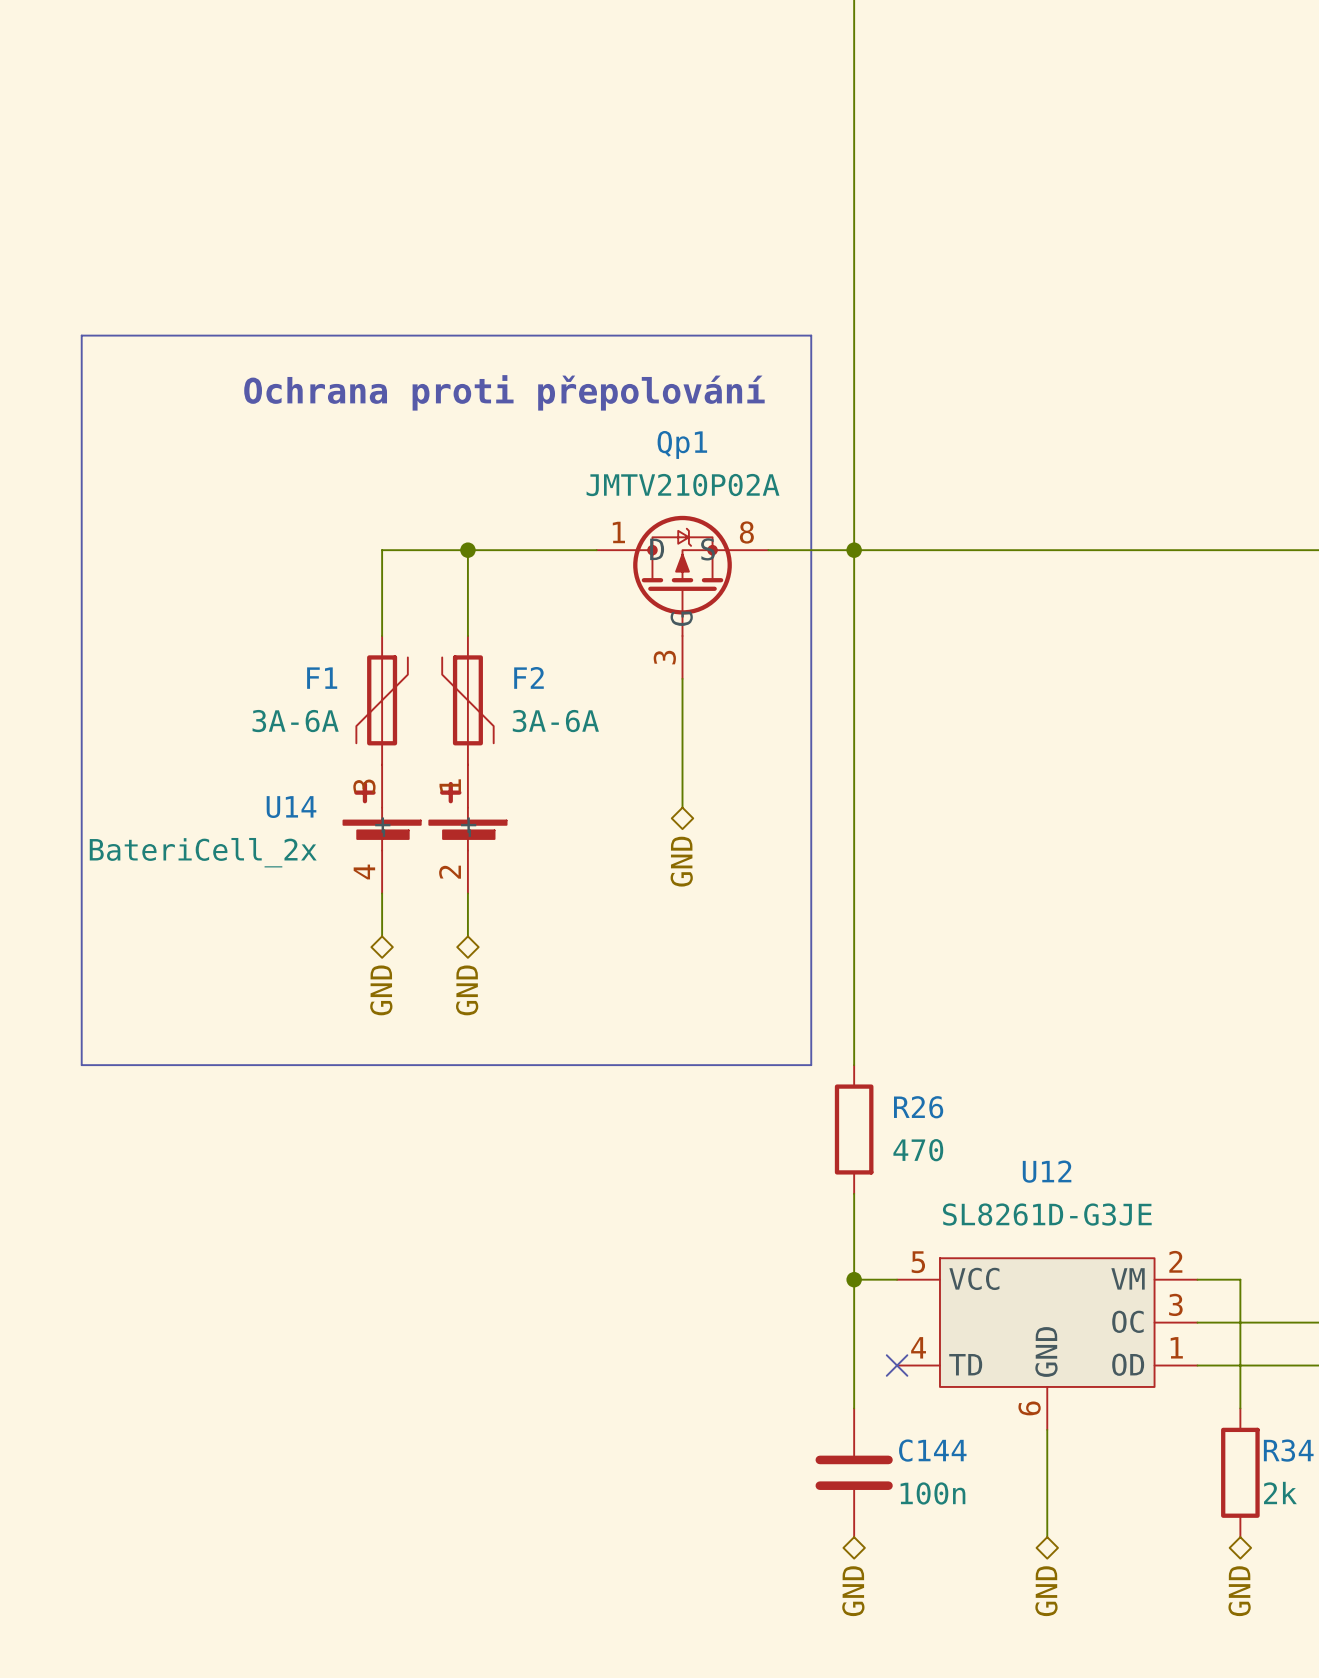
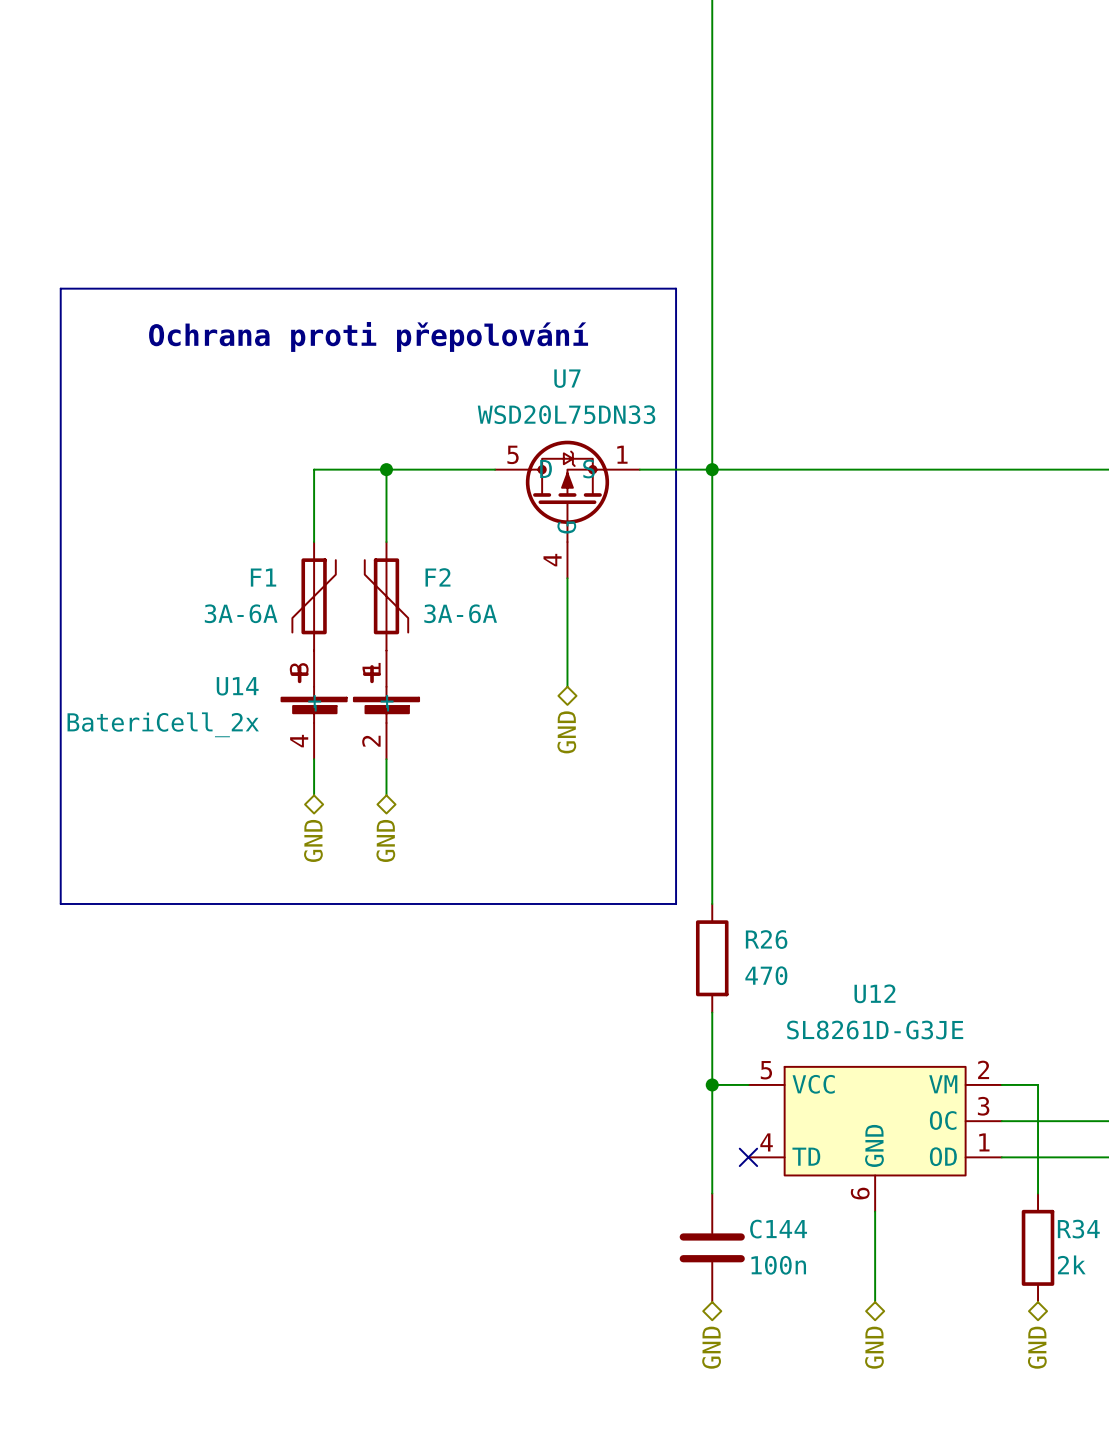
text position: Ochrana proti přepolování (504, 392) -> Ochrana proti přepolování (368, 336)
Qp1 name: Qp1 (682, 444) -> U7 (567, 378)
Qp1 value: JMTV210P02A (683, 485) -> WSD20L75DN33 (566, 414)
Qp1 pin number: 1 (618, 532) -> 5 (513, 454)
Qp1 pin number: 8 (746, 532) -> 1 (622, 454)
Qp1 pin number: 3 (664, 657) -> 4 (552, 560)

